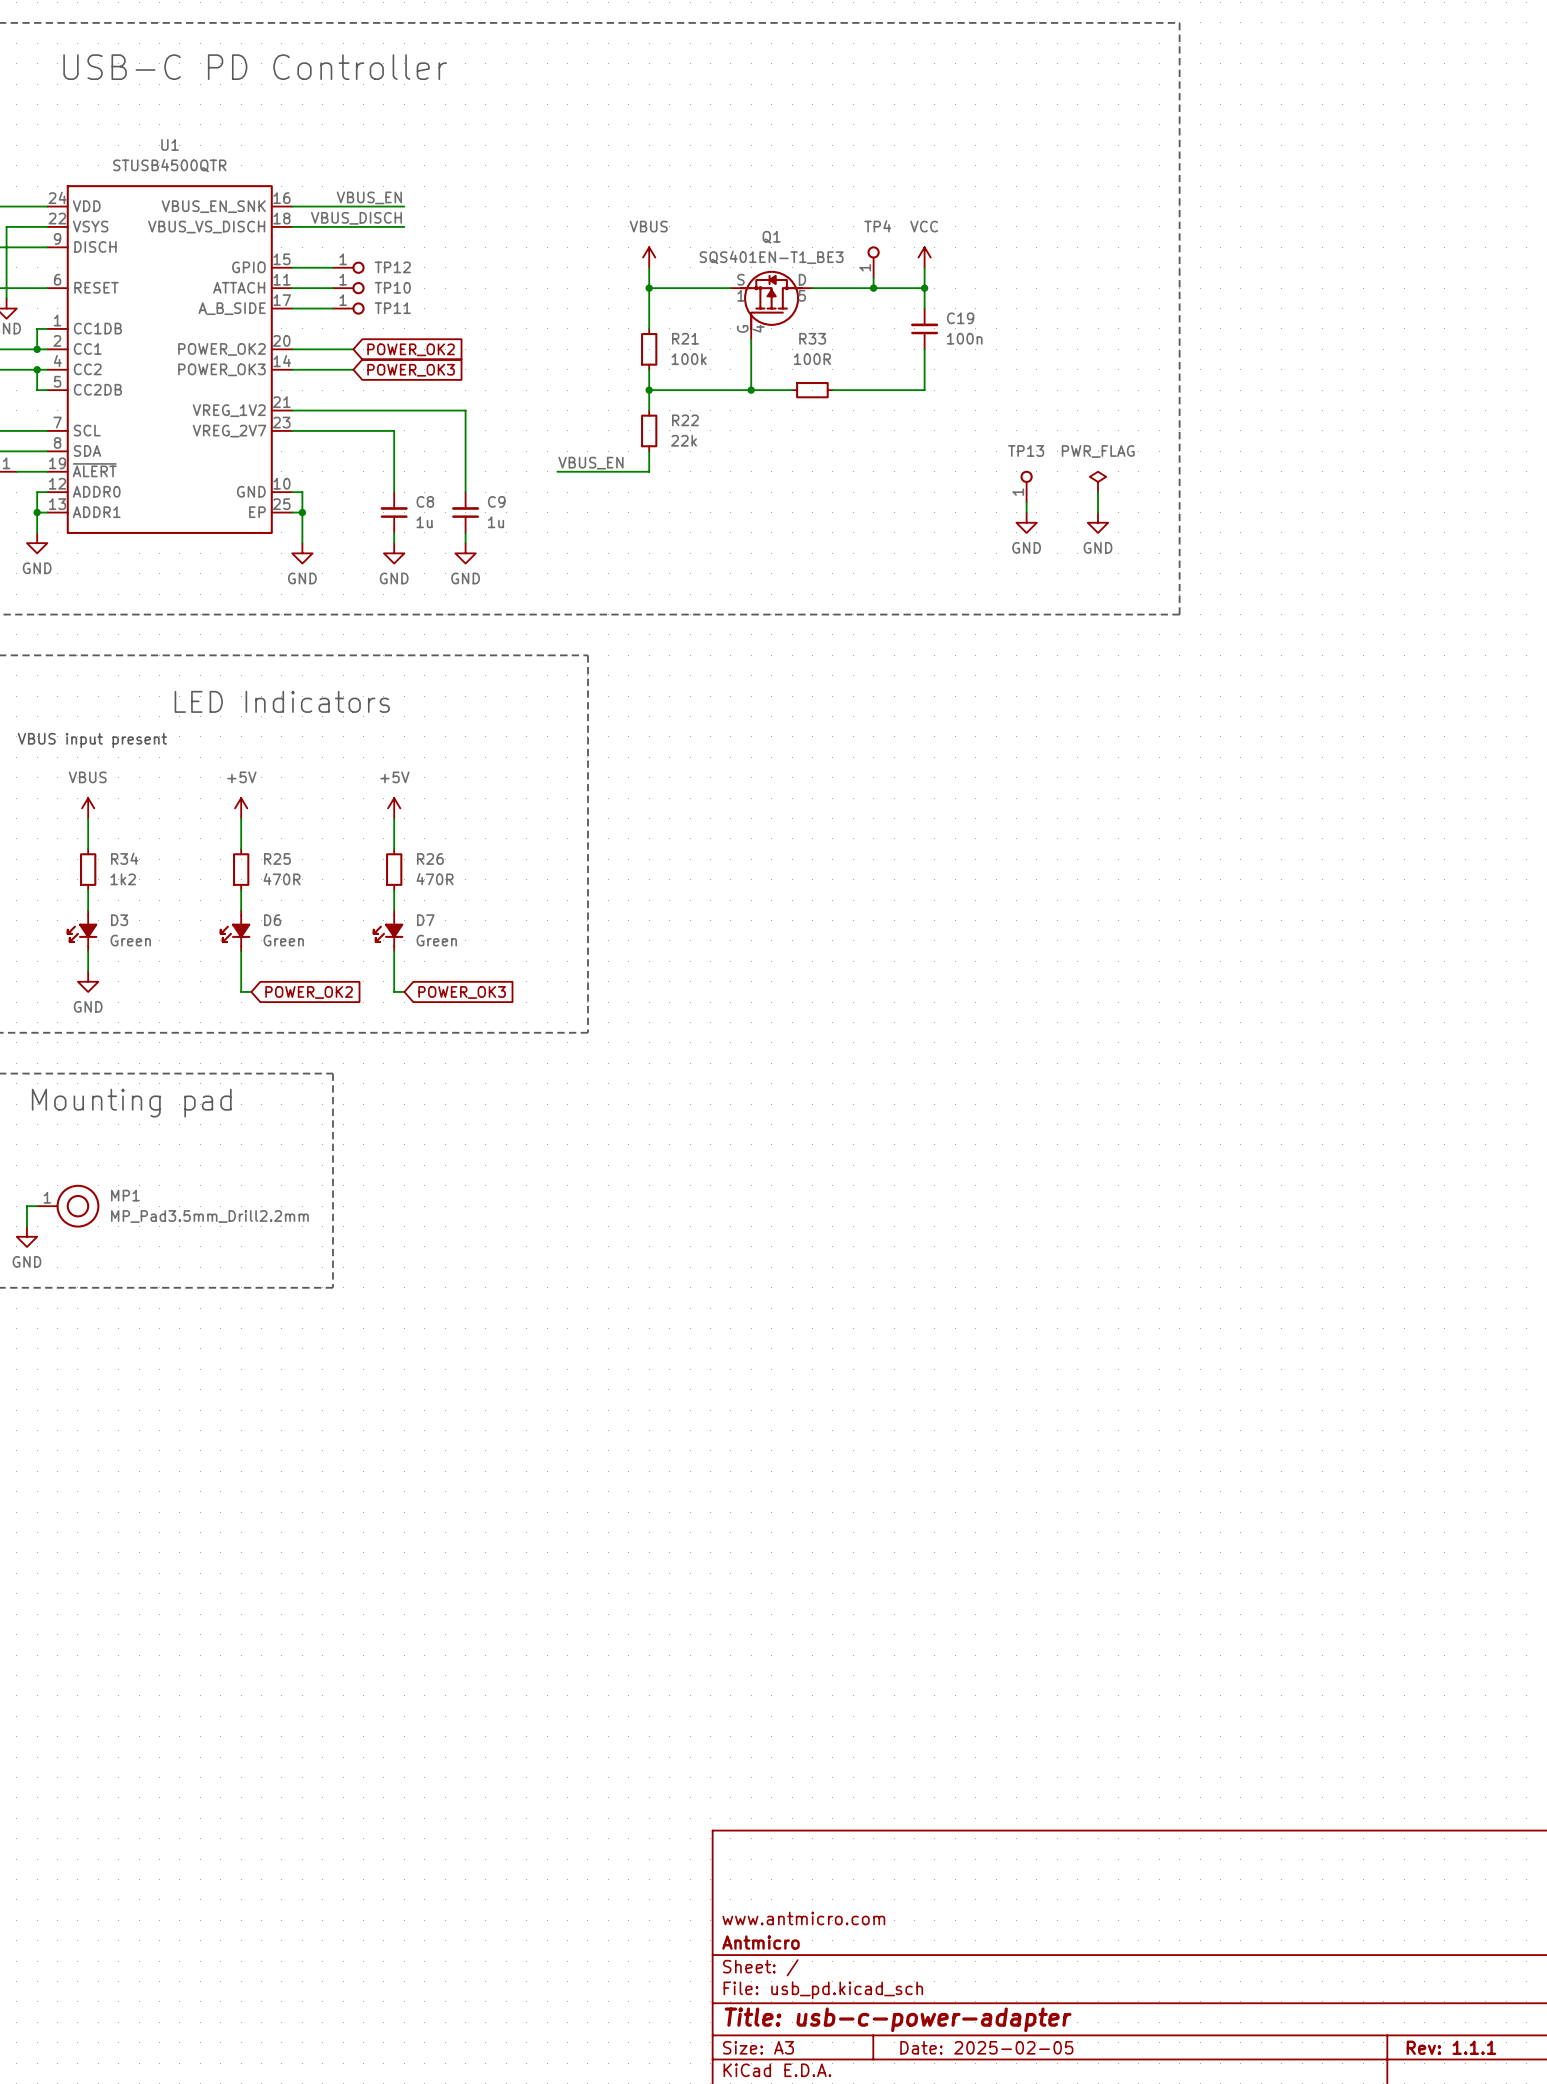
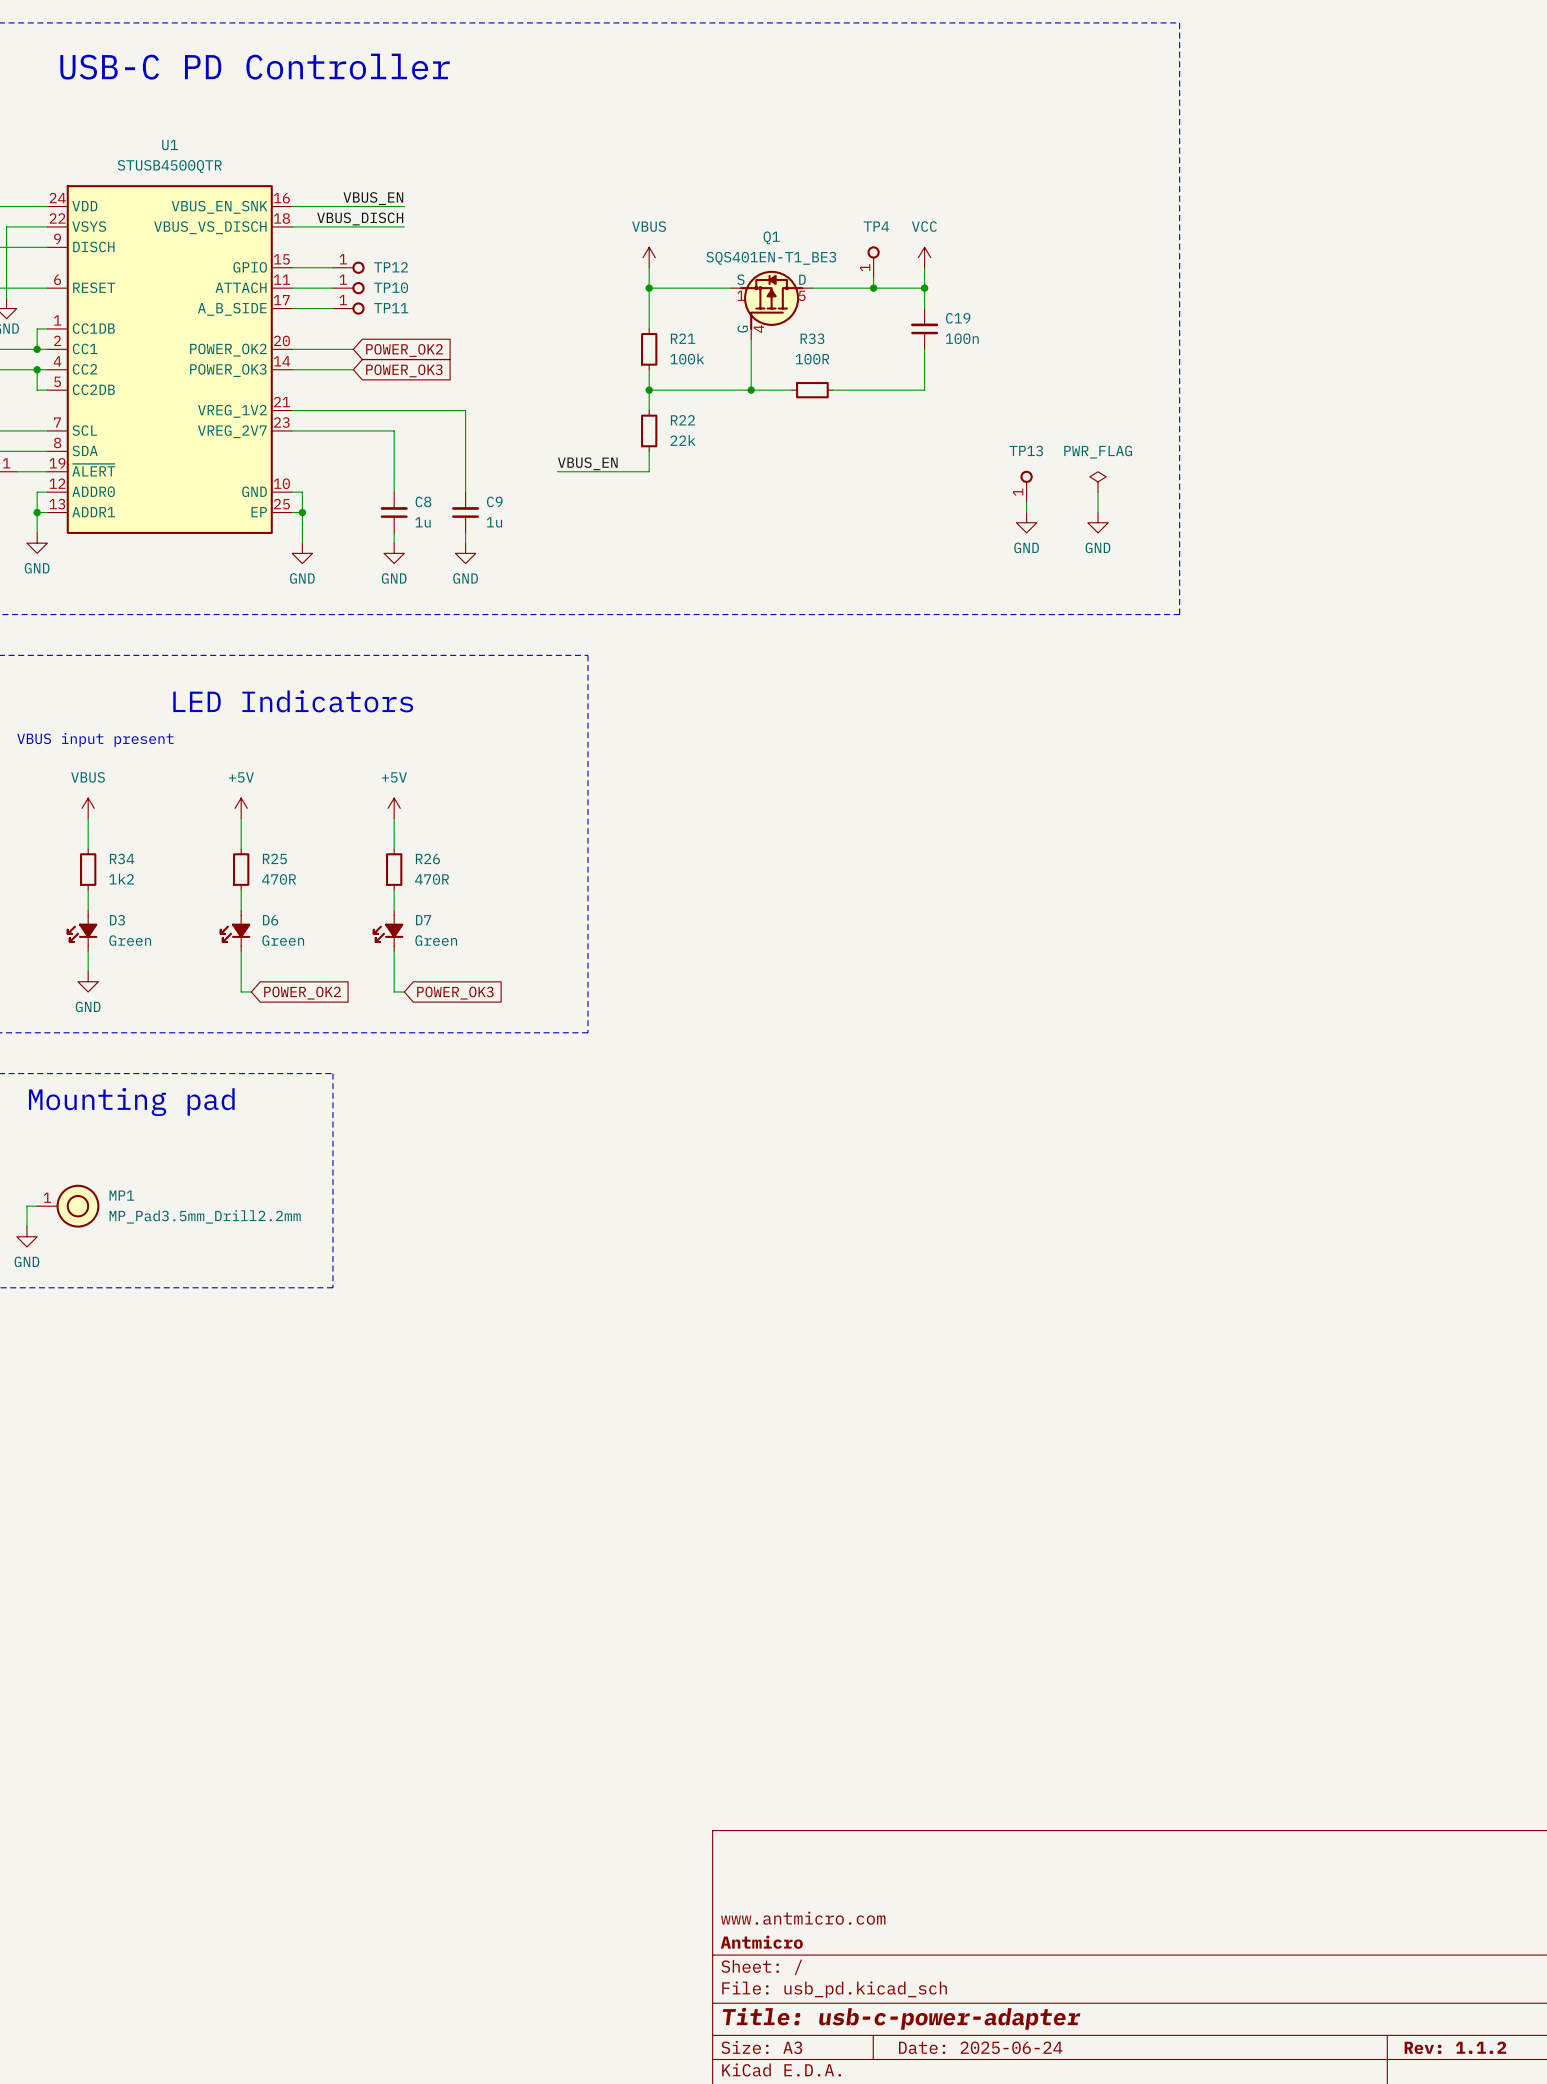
title block: Date: 2025-02-05 (986, 2047) -> Date: 2025-06-24 (980, 2047)
title block: Rev: 1.1.1 (1451, 2047) -> Rev: 1.1.2 (1455, 2047)

